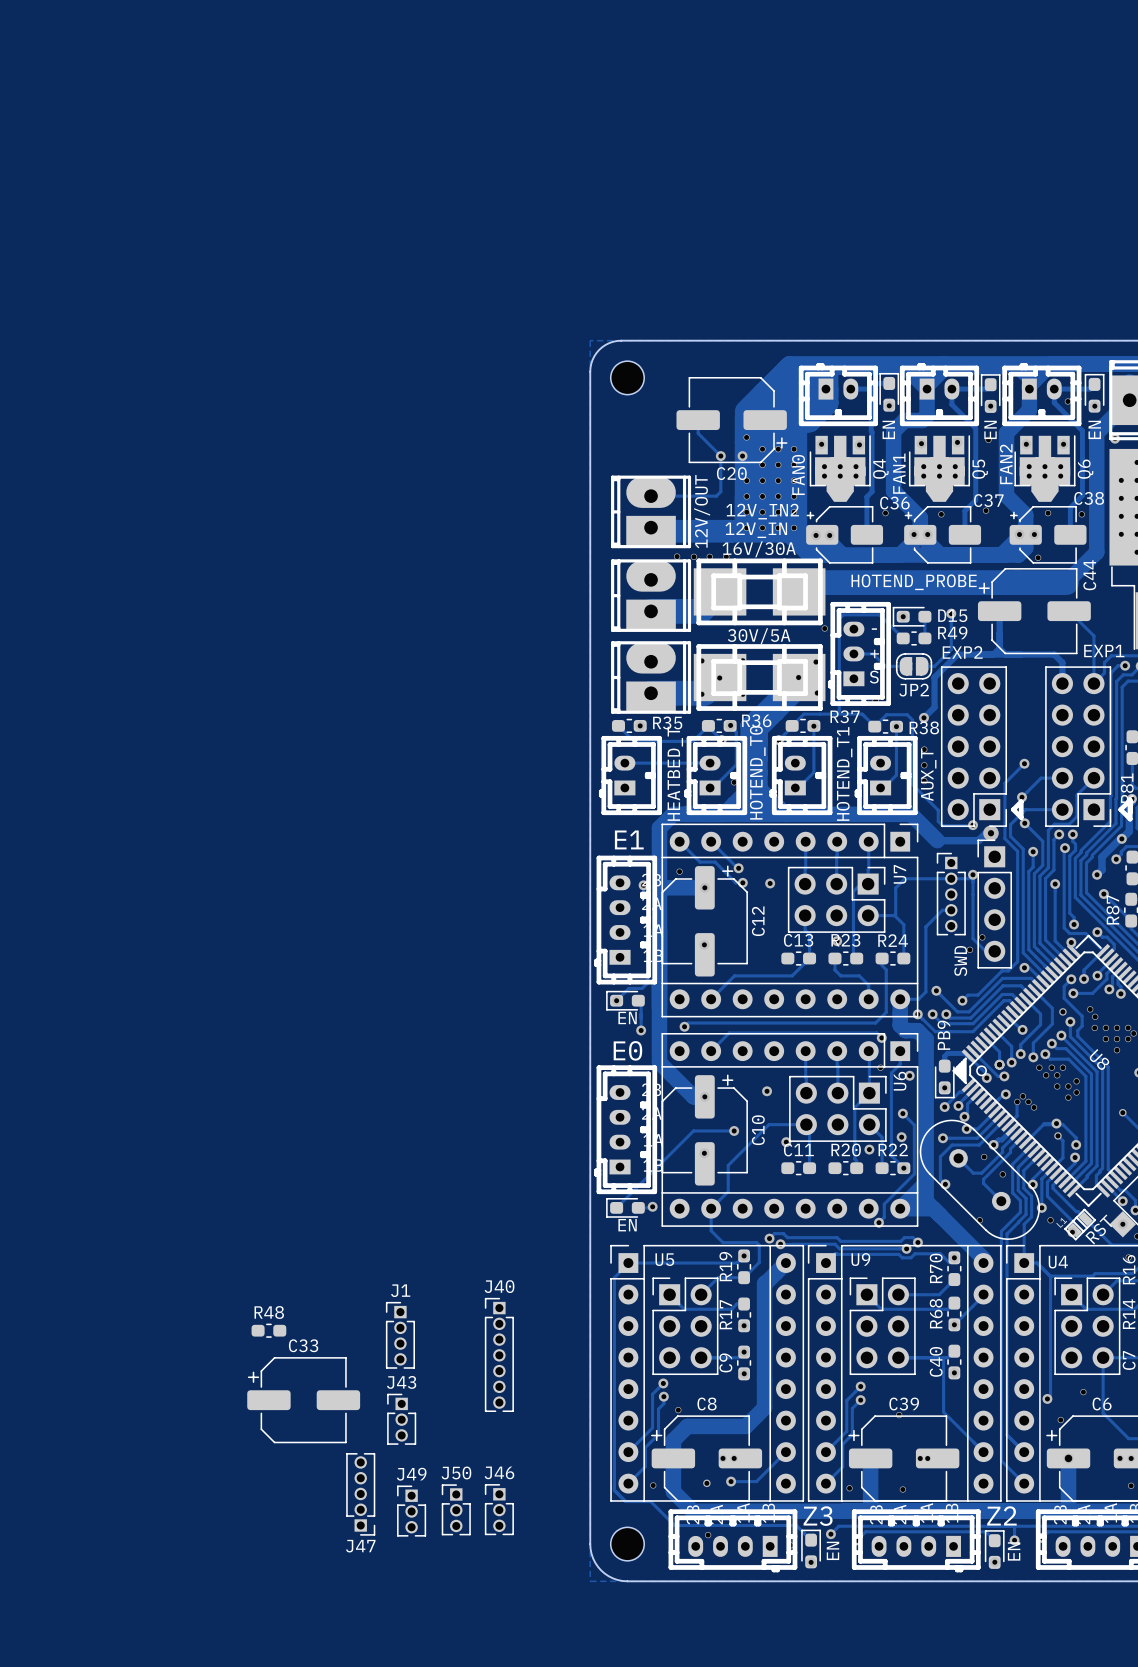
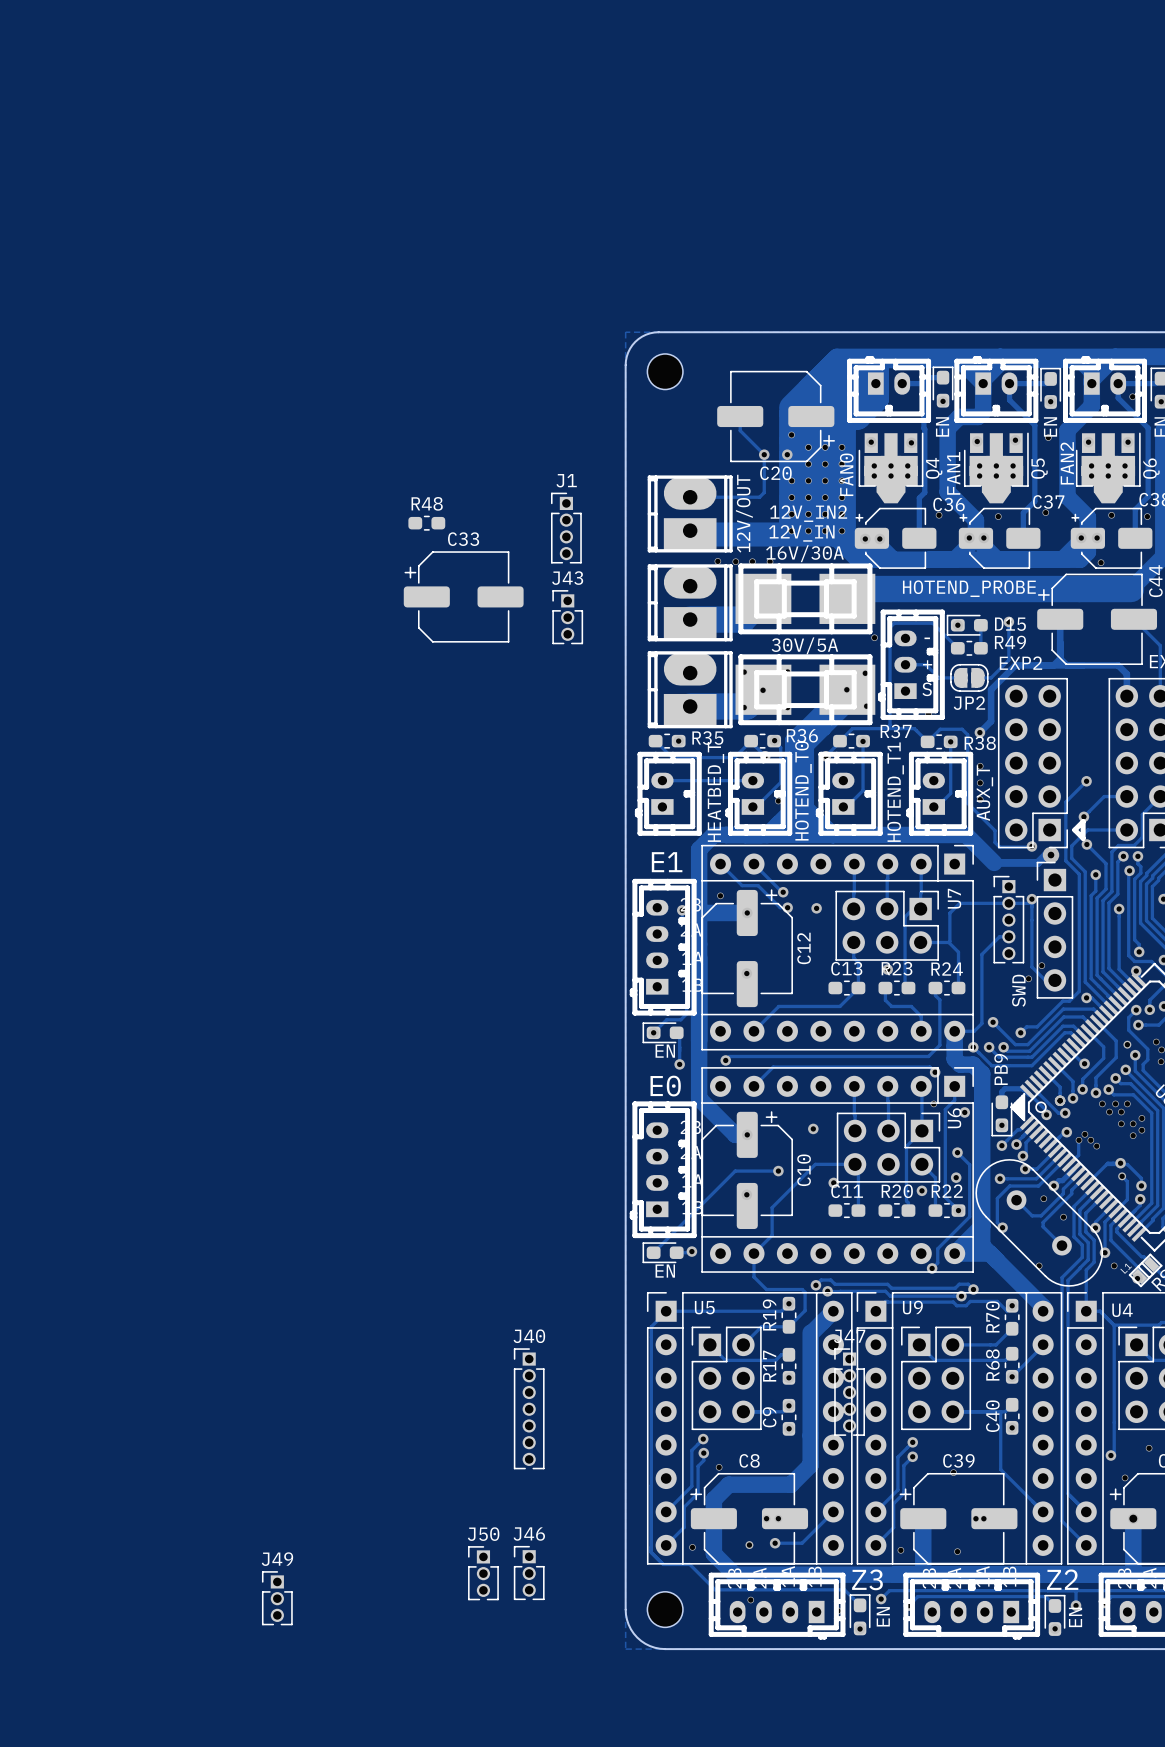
R48 position: (268, 1330) -> (426, 523)
J1 position: (400, 1335) -> (566, 528)
C33 position: (303, 1400) -> (463, 596)
J43 position: (401, 1419) -> (567, 617)
J47 rotation: 0° (360, 1494) -> 180° (849, 1392)
J47 position: (360, 1494) -> (849, 1392)
J49 position: (411, 1511) -> (277, 1598)

